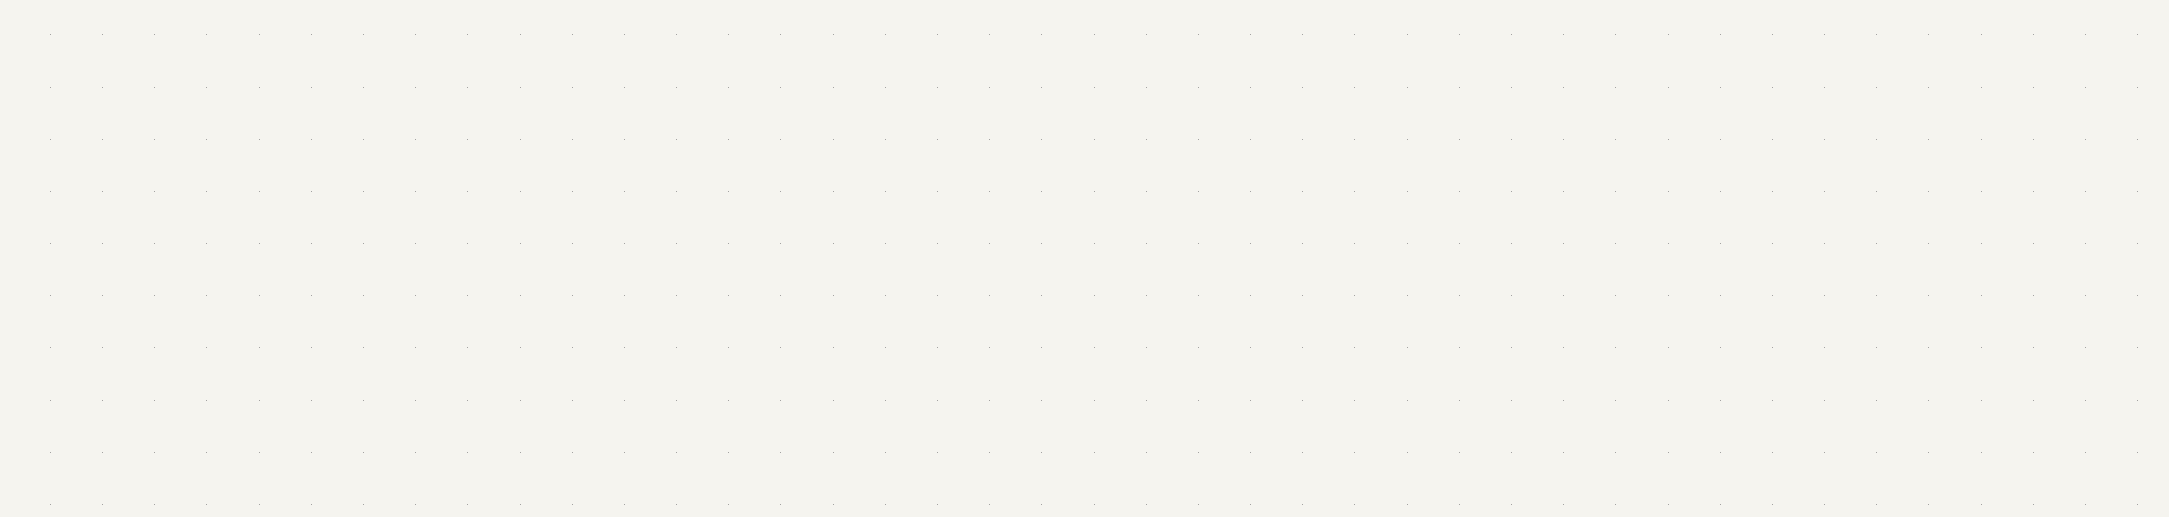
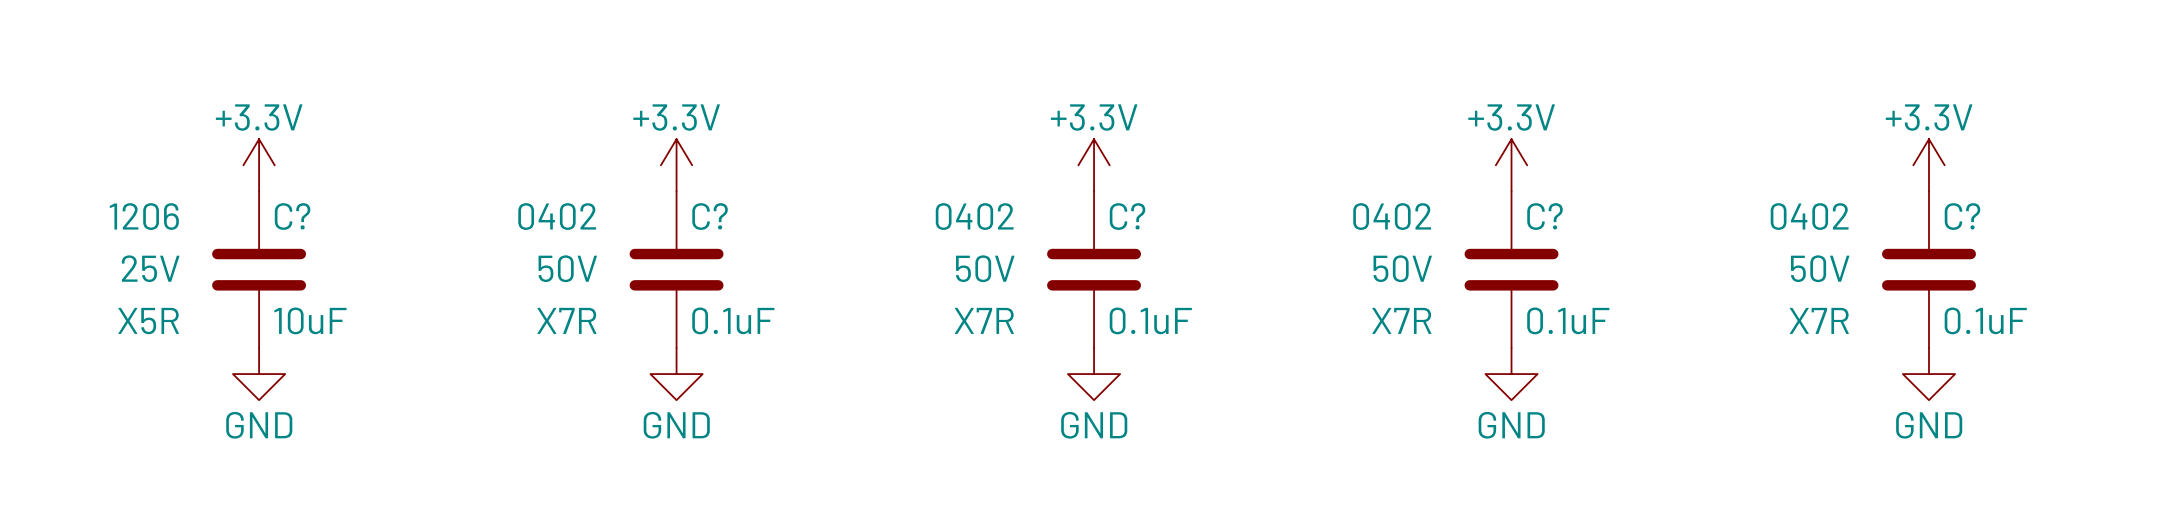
power symbol: none -> +3.3V (259, 165)
power symbol: none -> +3.3V (676, 165)
power symbol: none -> +3.3V (1094, 165)
power symbol: none -> +3.3V (1511, 165)
power symbol: none -> +3.3V (1928, 165)
C?: none -> 10uF (259, 269)
C?: none -> 0.1uF (676, 269)
C?: none -> 0.1uF (1094, 269)
C?: none -> 0.1uF (1511, 269)
C?: none -> 0.1uF (1928, 269)
power symbol: none -> GND (259, 374)
power symbol: none -> GND (676, 374)
power symbol: none -> GND (1094, 374)
power symbol: none -> GND (1511, 374)
power symbol: none -> GND (1928, 374)

